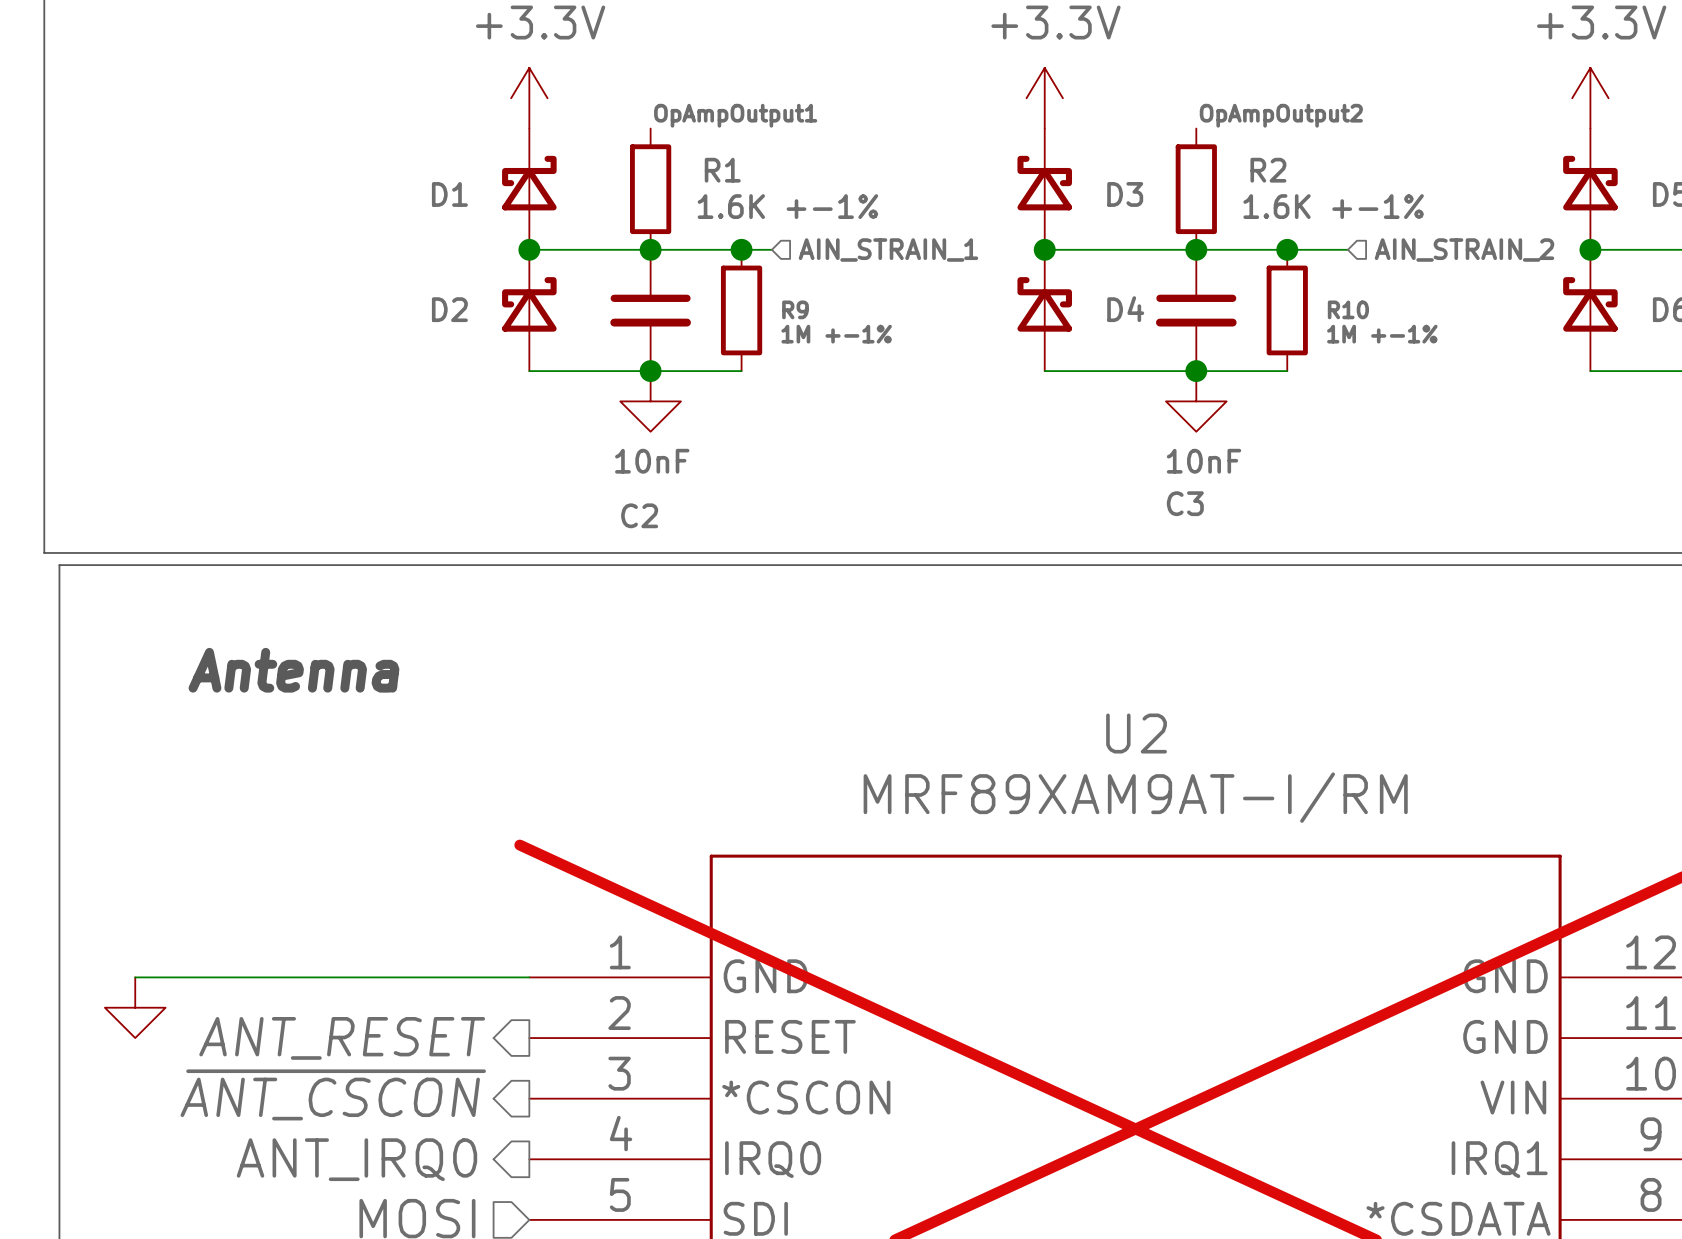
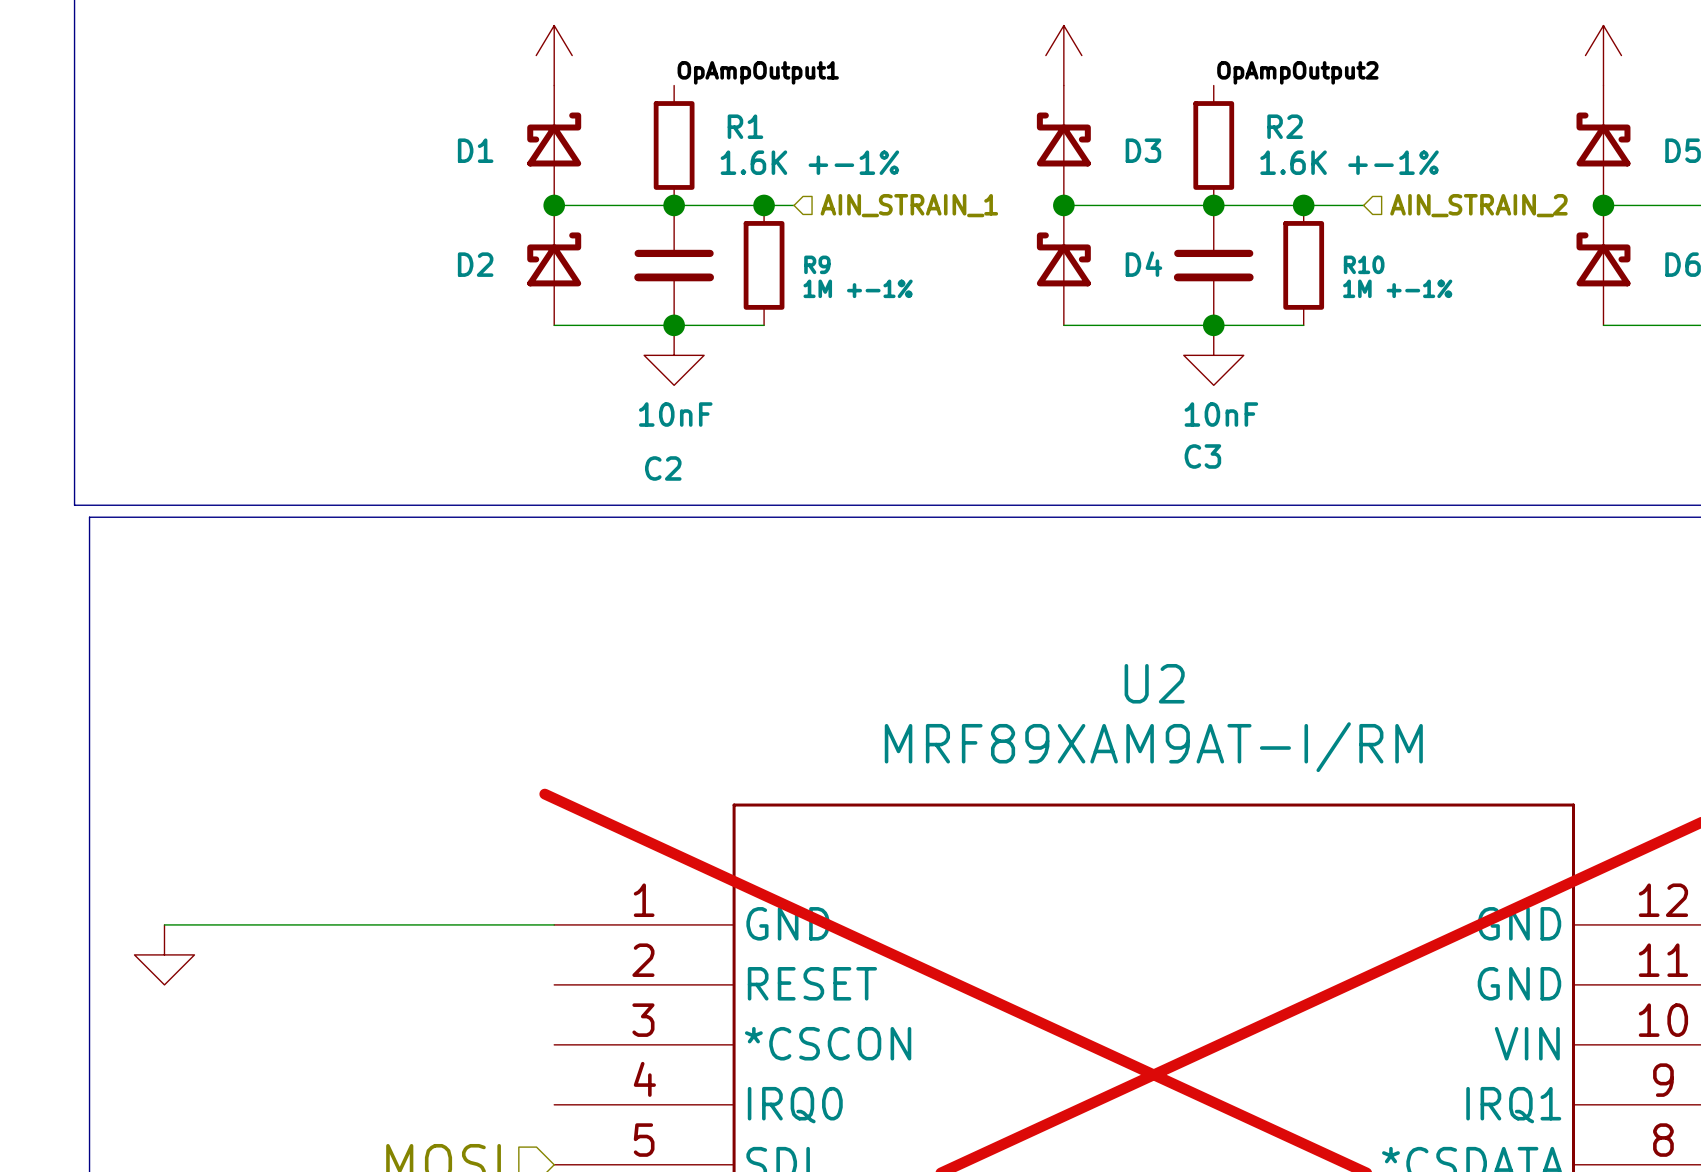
text: Antenna (293, 670) -> none
hierarchical label: ANT_RESET (342, 1038) -> none
hierarchical label: ~{ANT_CSCON} (333, 1094) -> none
hierarchical label: ANT_IRQ0 (356, 1159) -> none

